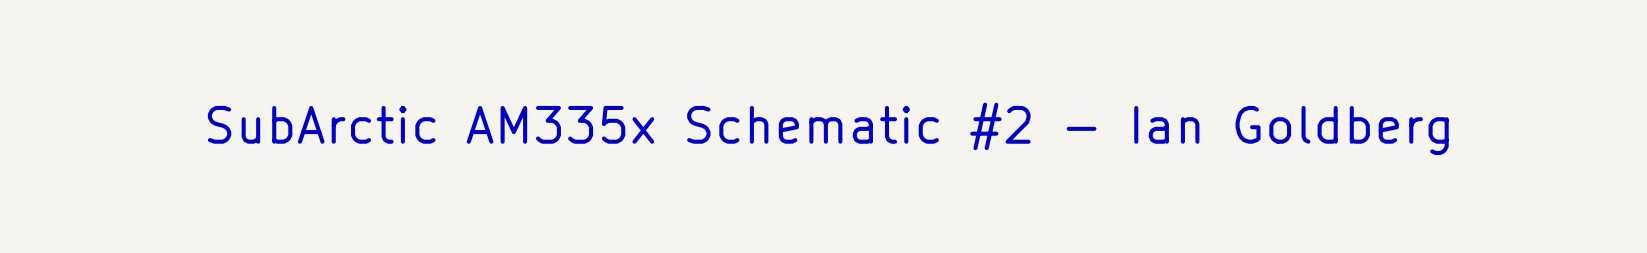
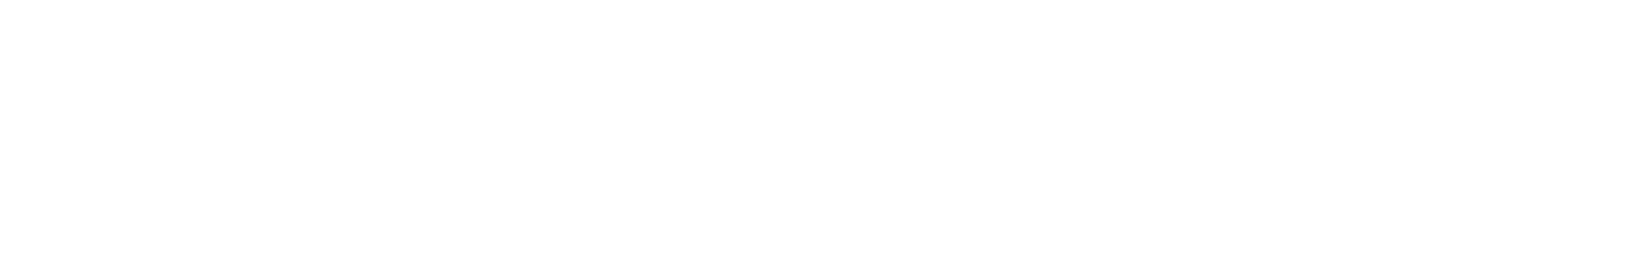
text: SubArctic AM335x Schematic #2 - Ian Goldberg (828, 128) -> none

